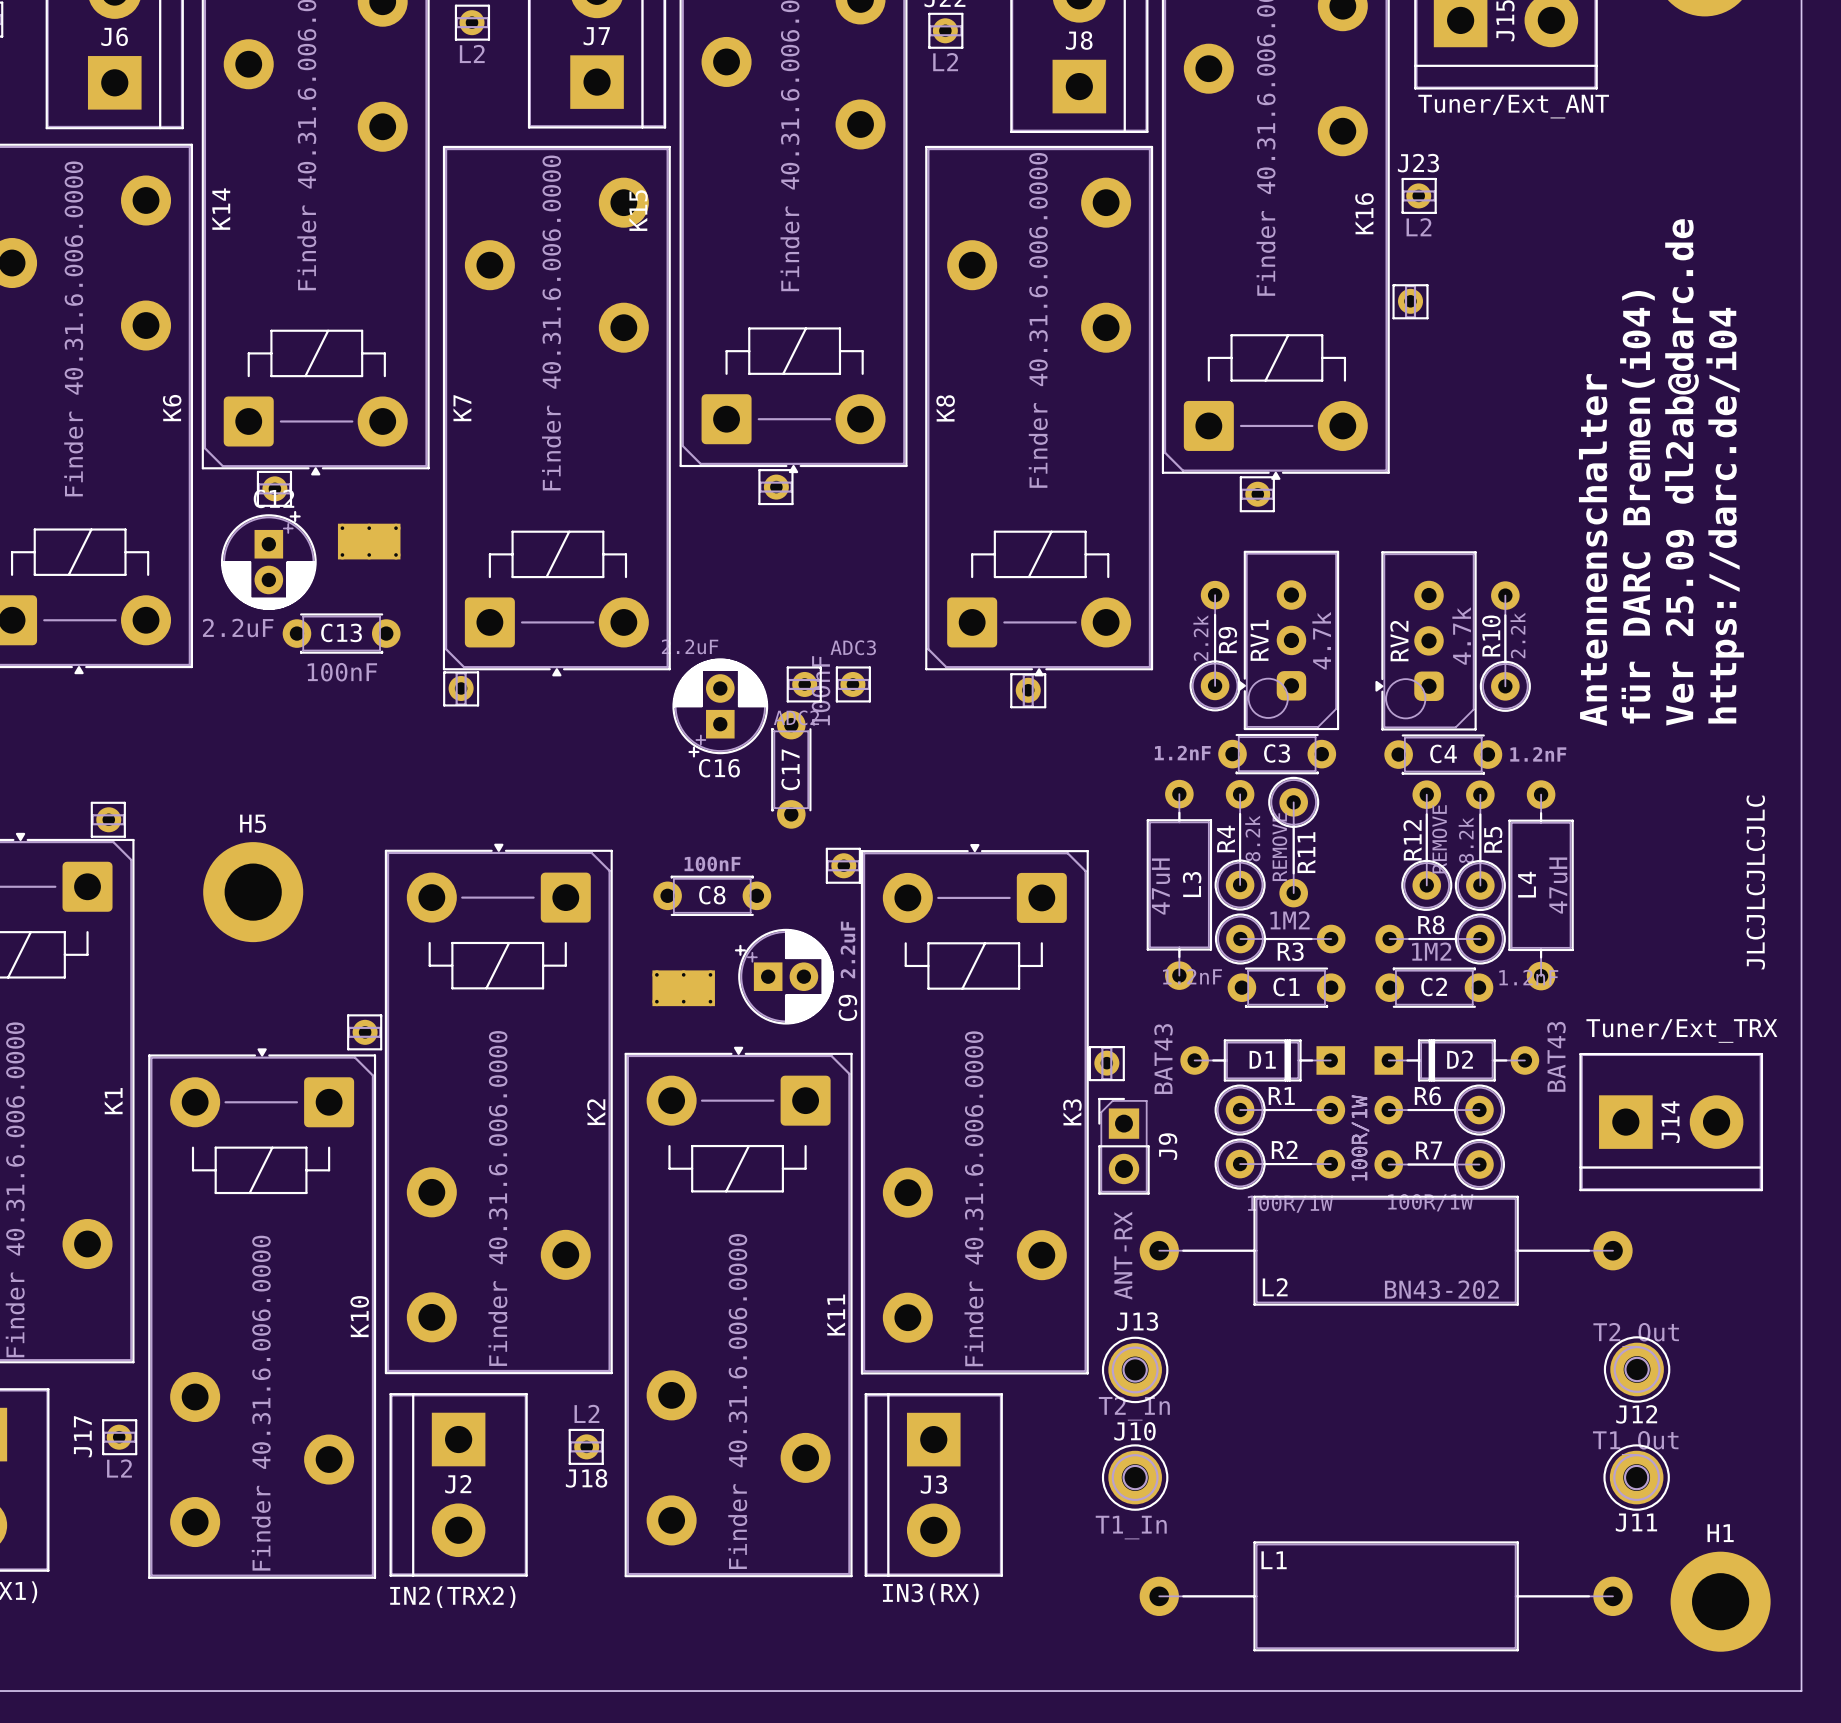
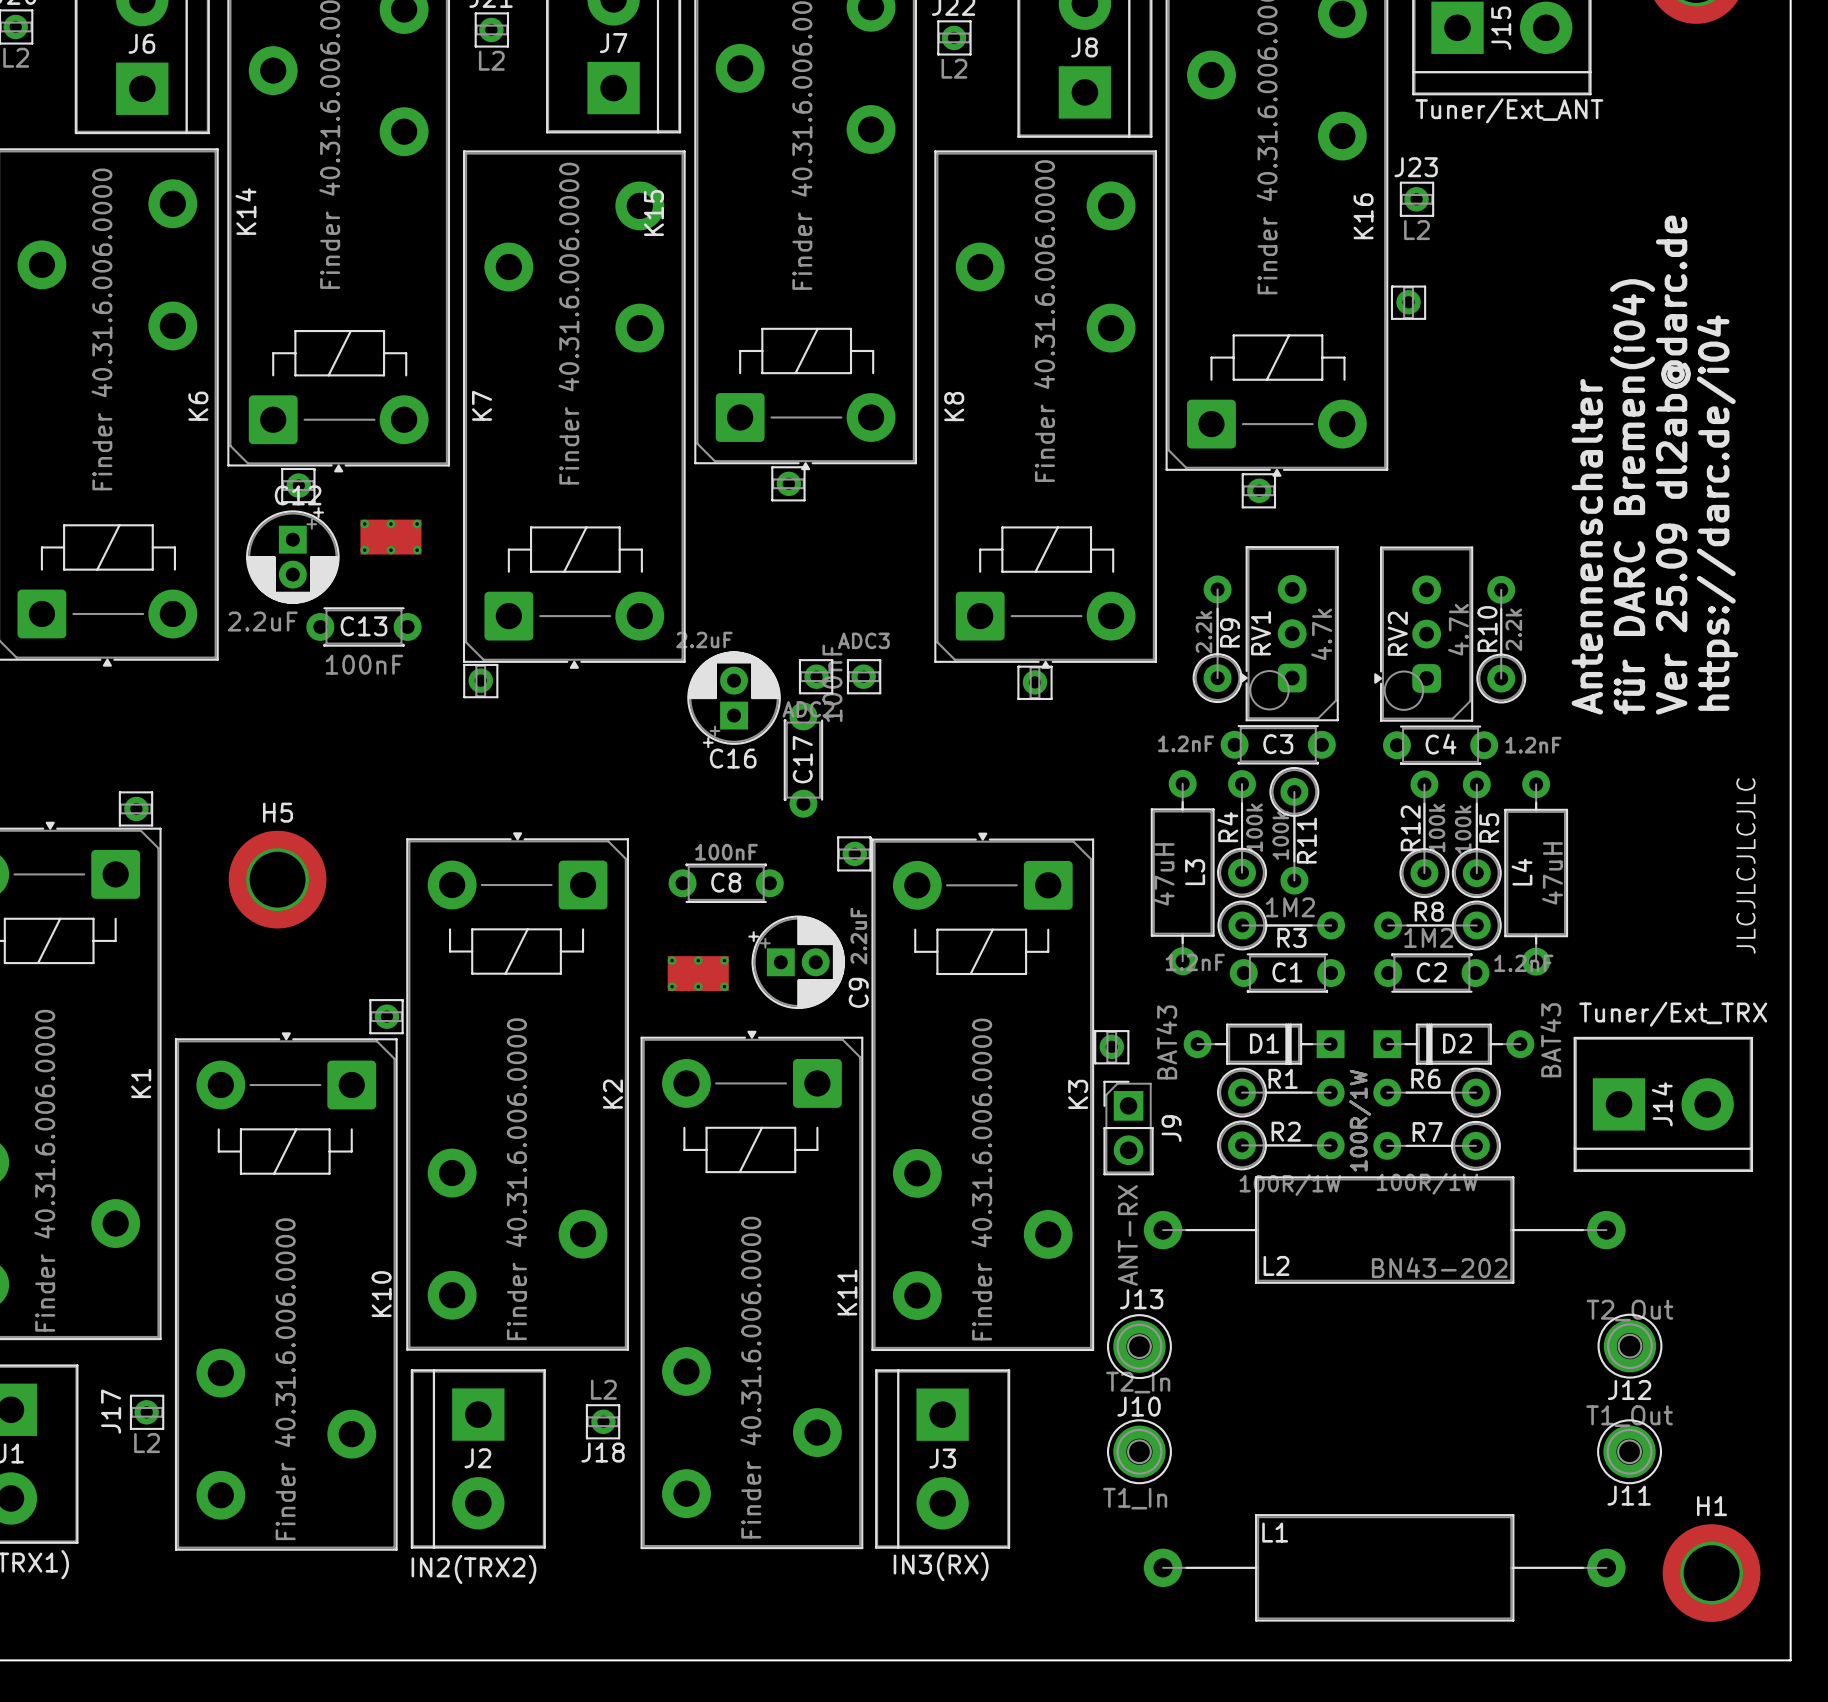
R4 value: 8.2k (1252, 838) -> 100k (1254, 827)
R12 value: REMOVE (1439, 839) -> 100k (1437, 828)
R5 value: 8.2k (1466, 840) -> 100k (1463, 829)
R11 value: REMOVE (1279, 846) -> 100k (1280, 835)

